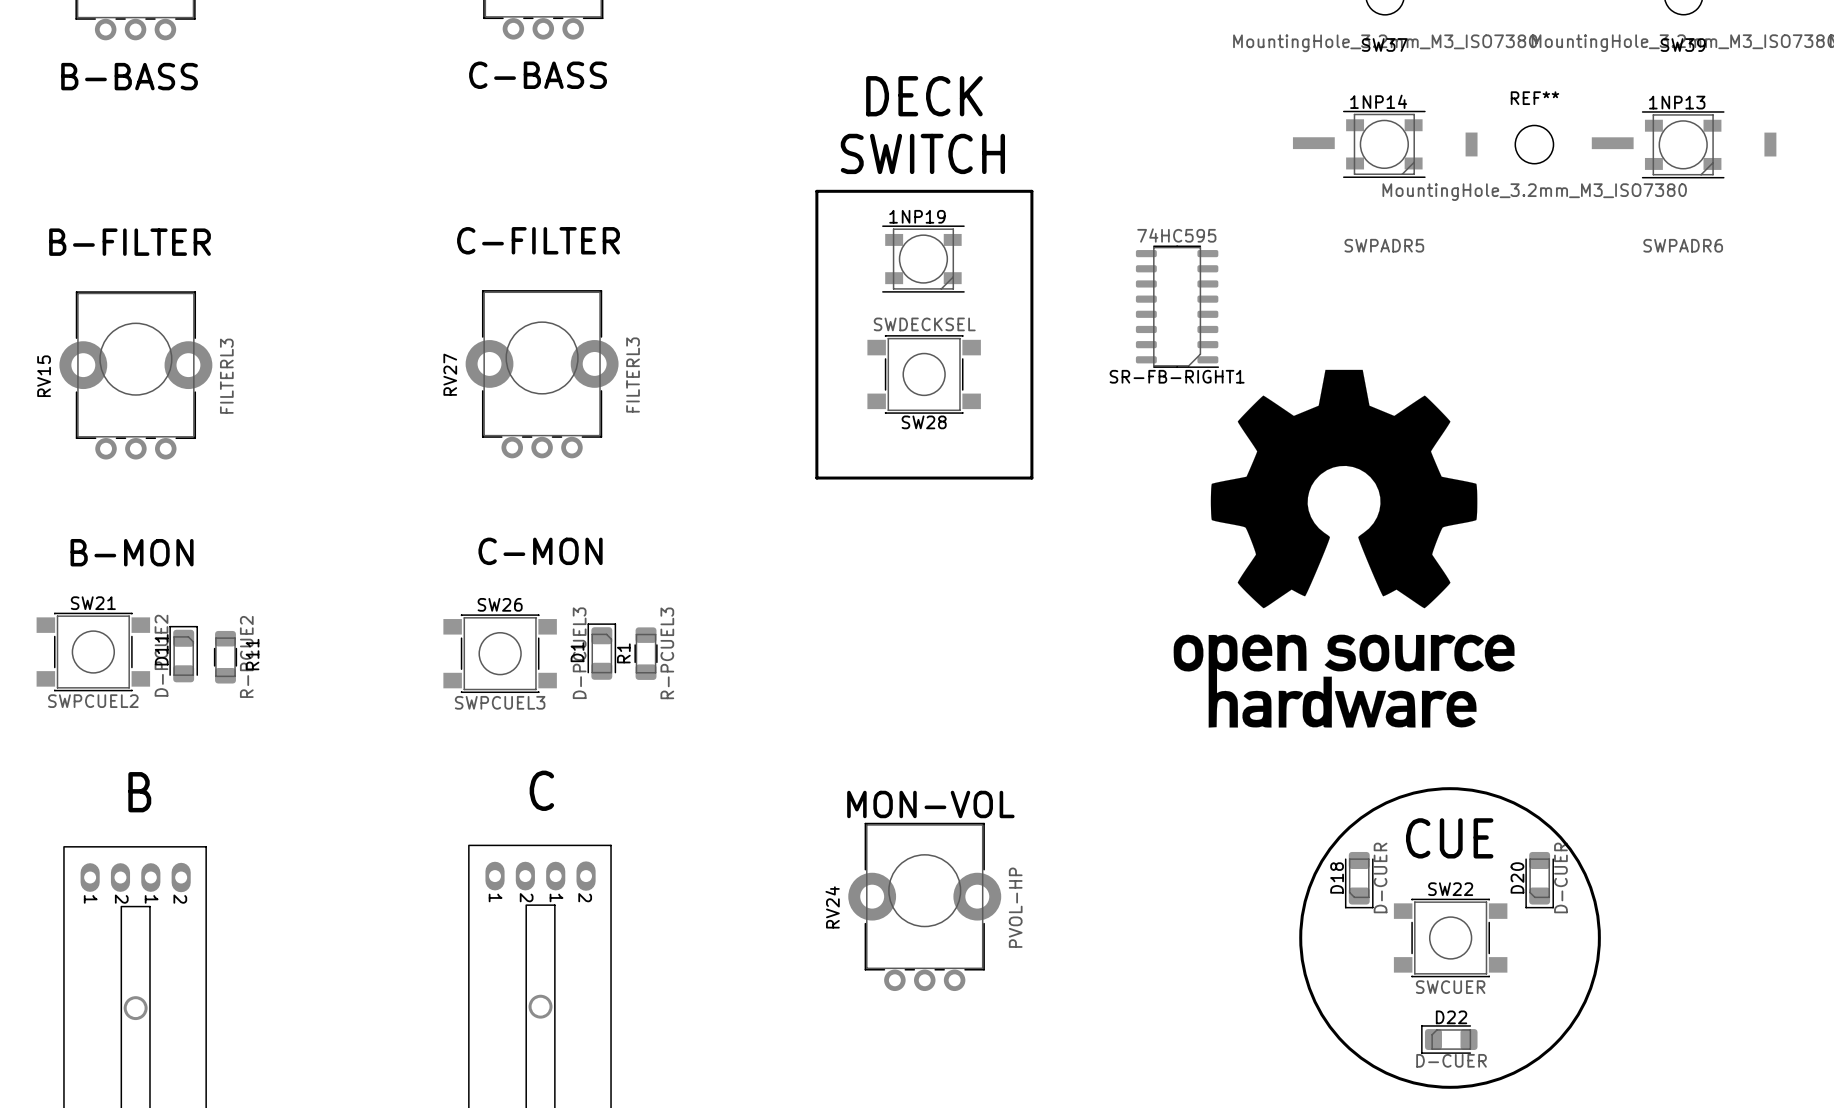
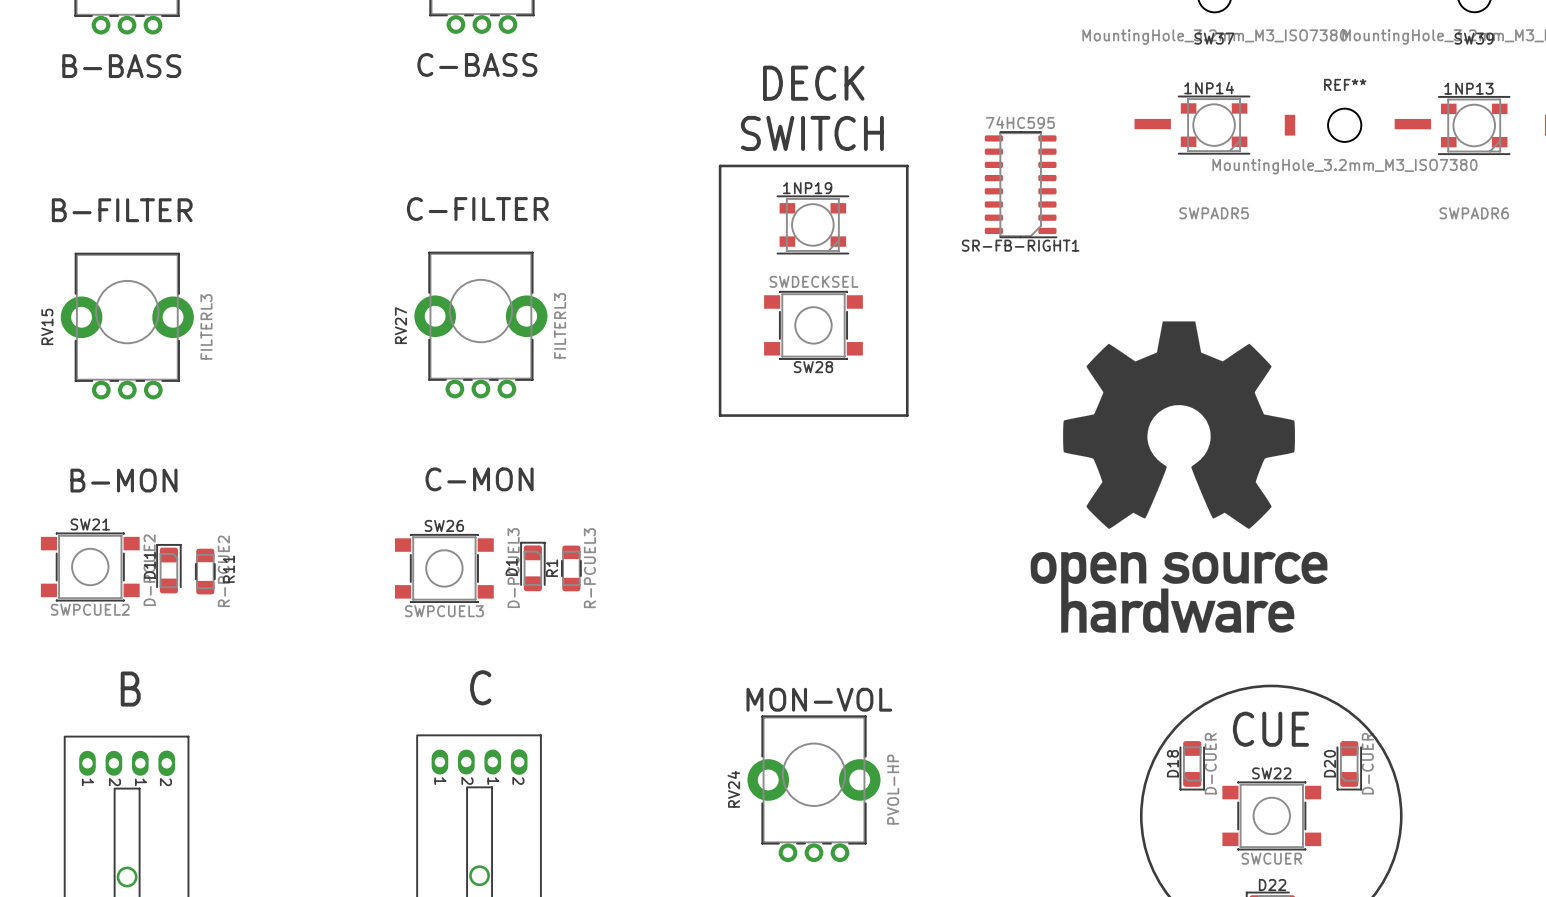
SR-FB-RIGHT1 position: (1177, 306) -> (1020, 184)

